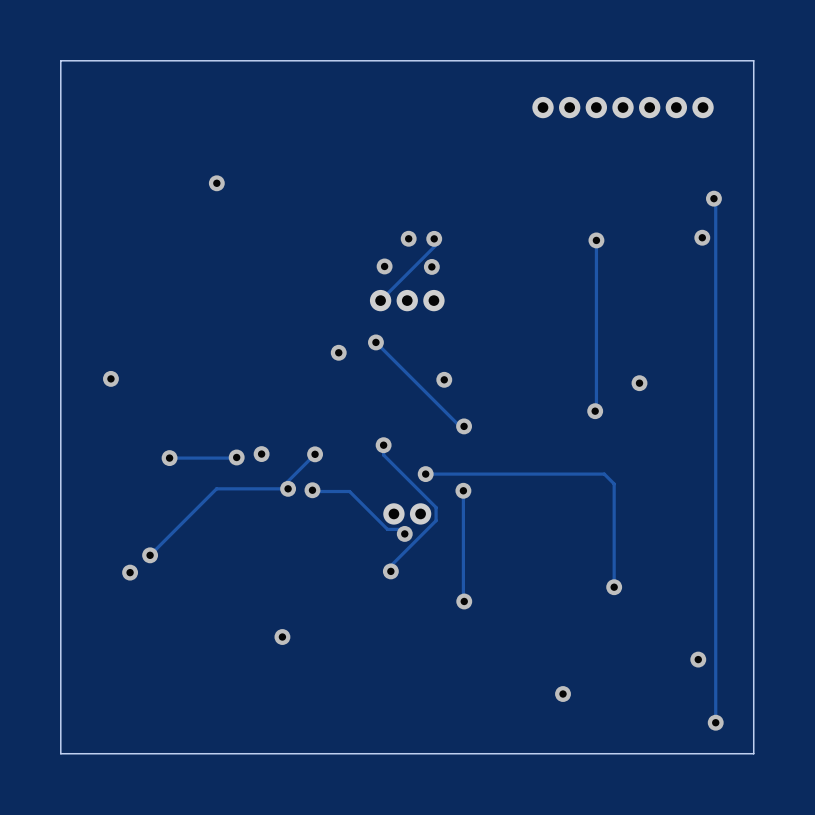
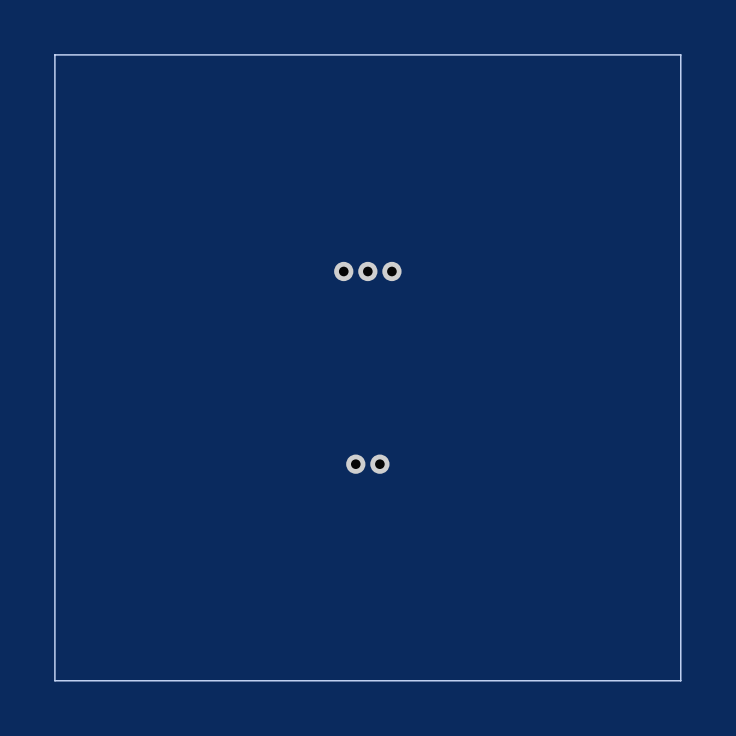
part: (623, 107) -> none
via: (216, 183) -> none
track: (713, 198) (715, 201) (715, 722) -> none
via: (713, 198) -> none
via: (702, 237) -> none
via: (408, 238) -> none
track: (434, 238) (438, 242) (380, 300) -> none
via: (434, 238) -> none
track: (596, 240) (595, 411) -> none
via: (596, 240) -> none
via: (384, 266) -> none
via: (431, 266) -> none
track: (375, 342) (459, 426) (464, 426) -> none
via: (375, 342) -> none
via: (338, 352) -> none
via: (110, 378) -> none
via: (444, 379) -> none
via: (639, 383) -> none
via: (595, 411) -> none
via: (464, 426) -> none
track: (383, 445) (383, 455) (436, 507) (436, 520) (390, 565) (390, 571) -> none
via: (383, 445) -> none
via: (261, 454) -> none
track: (315, 454) (287, 481) (287, 488) -> none
via: (315, 454) -> none
track: (236, 457) (169, 458) -> none
via: (236, 457) -> none
via: (169, 458) -> none
track: (425, 474) (604, 474) (614, 483) (614, 587) -> none
via: (425, 474) -> none
track: (288, 488) (216, 488) (150, 555) -> none
via: (288, 488) -> none
track: (312, 490) (349, 491) (387, 529) (400, 529) (404, 533) -> none
via: (312, 490) -> none
track: (463, 490) (464, 601) -> none
via: (463, 490) -> none
via: (404, 533) -> none
via: (150, 555) -> none
via: (390, 571) -> none
via: (130, 572) -> none
via: (614, 587) -> none
via: (464, 601) -> none
via: (282, 637) -> none
via: (698, 659) -> none
via: (563, 694) -> none
via: (715, 722) -> none

